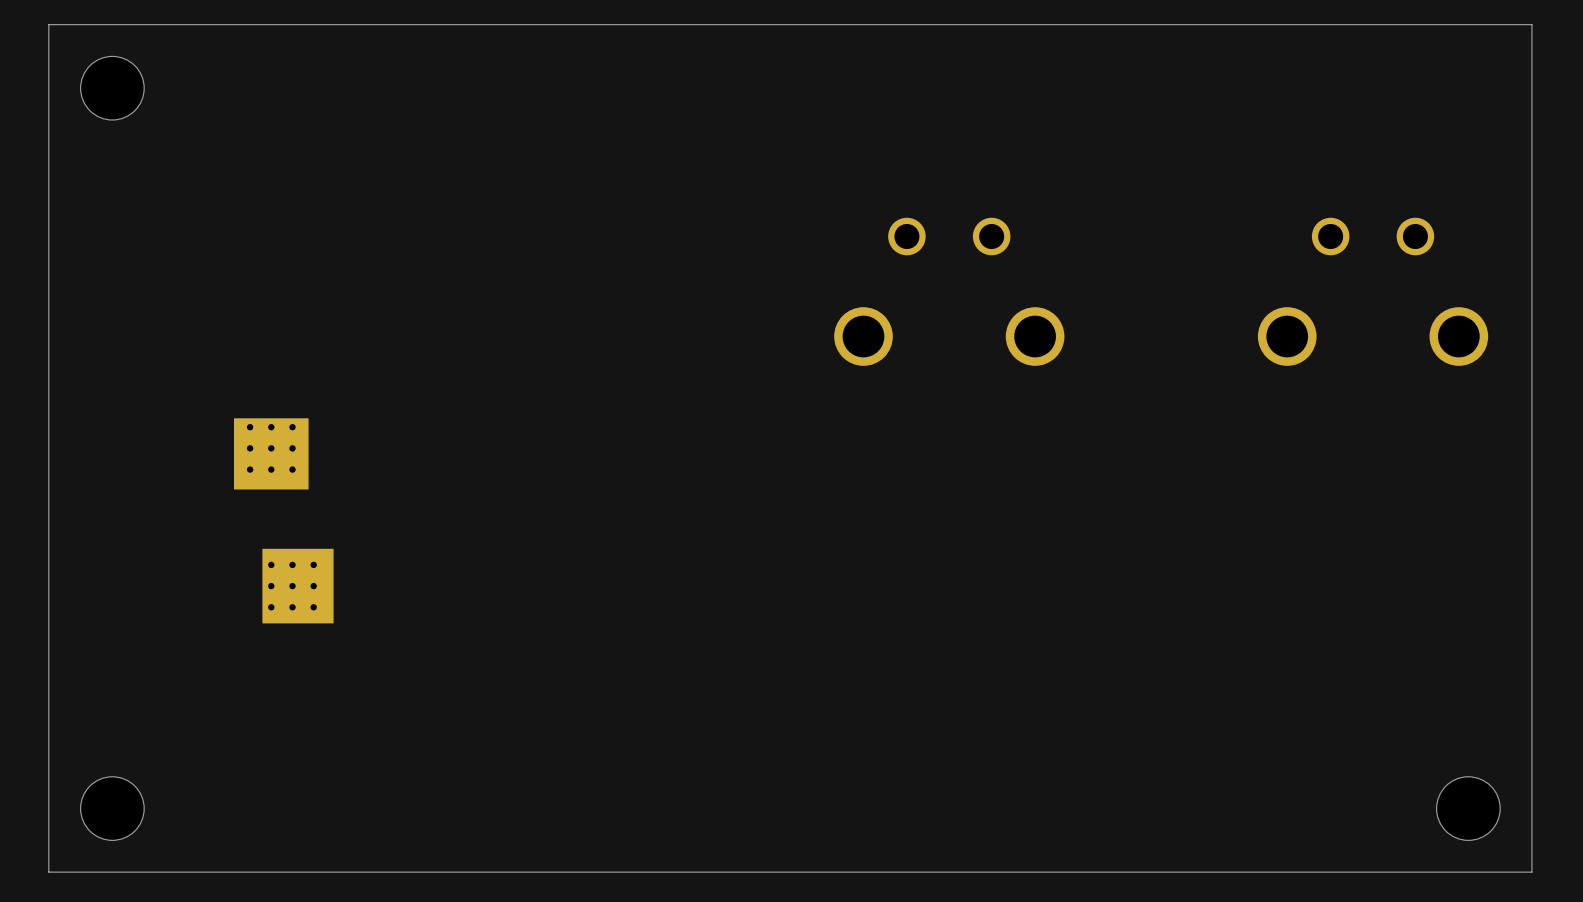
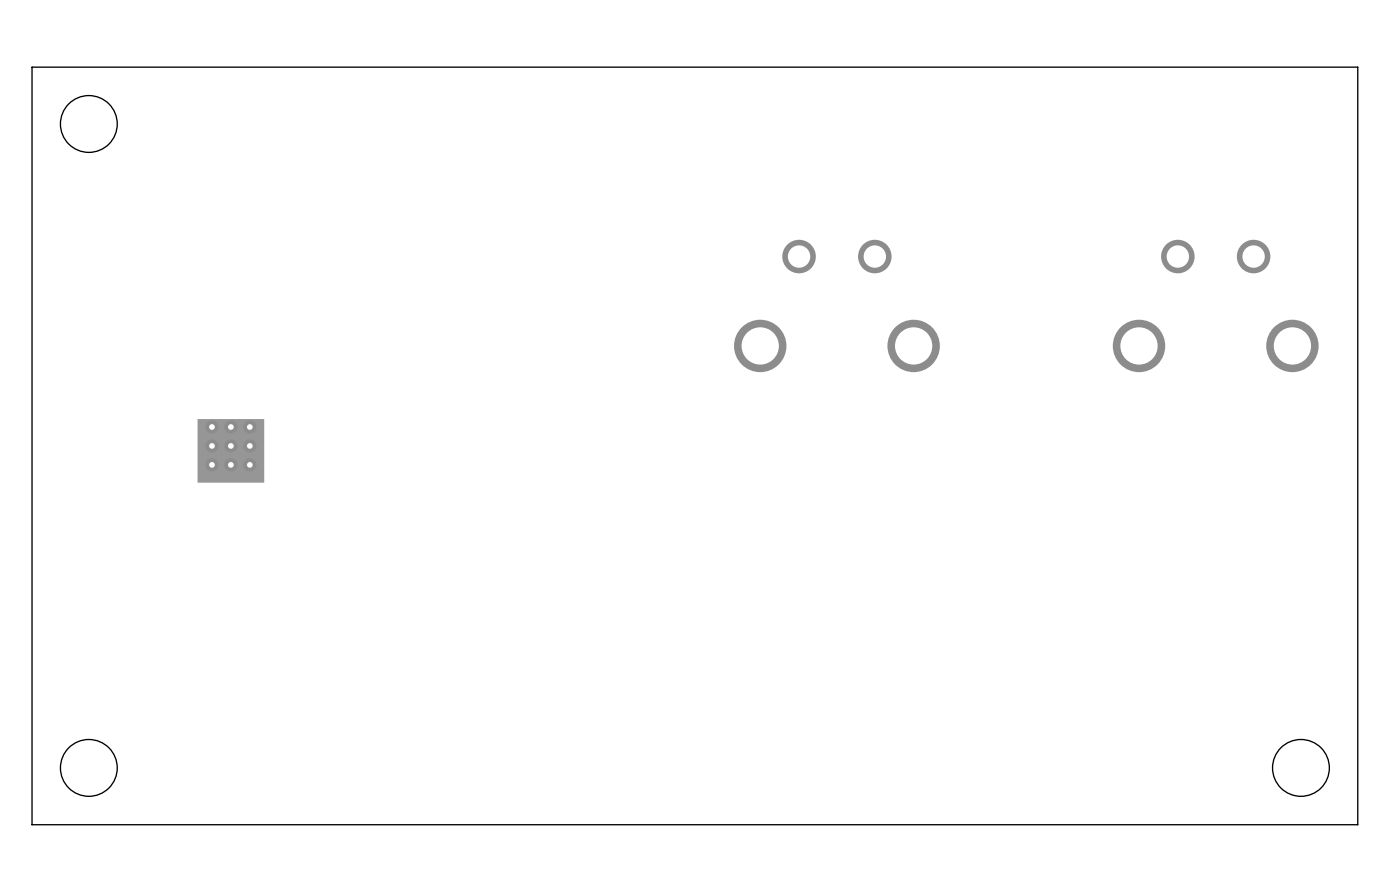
part: (297, 586) -> none

